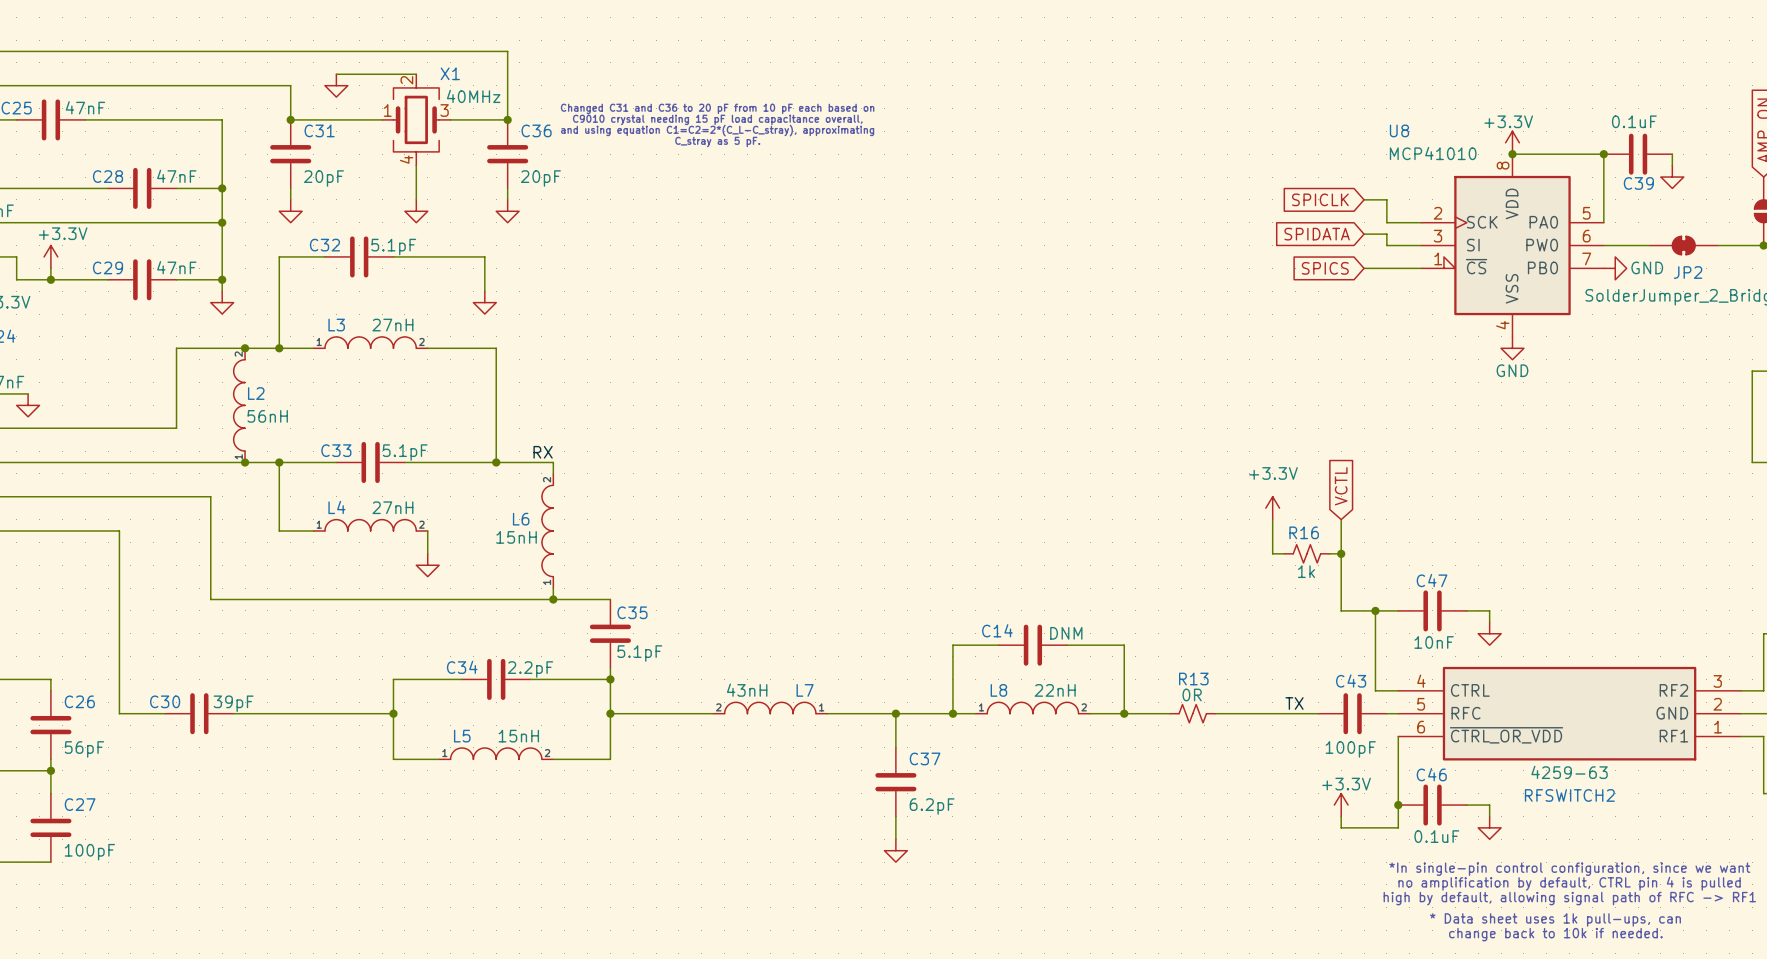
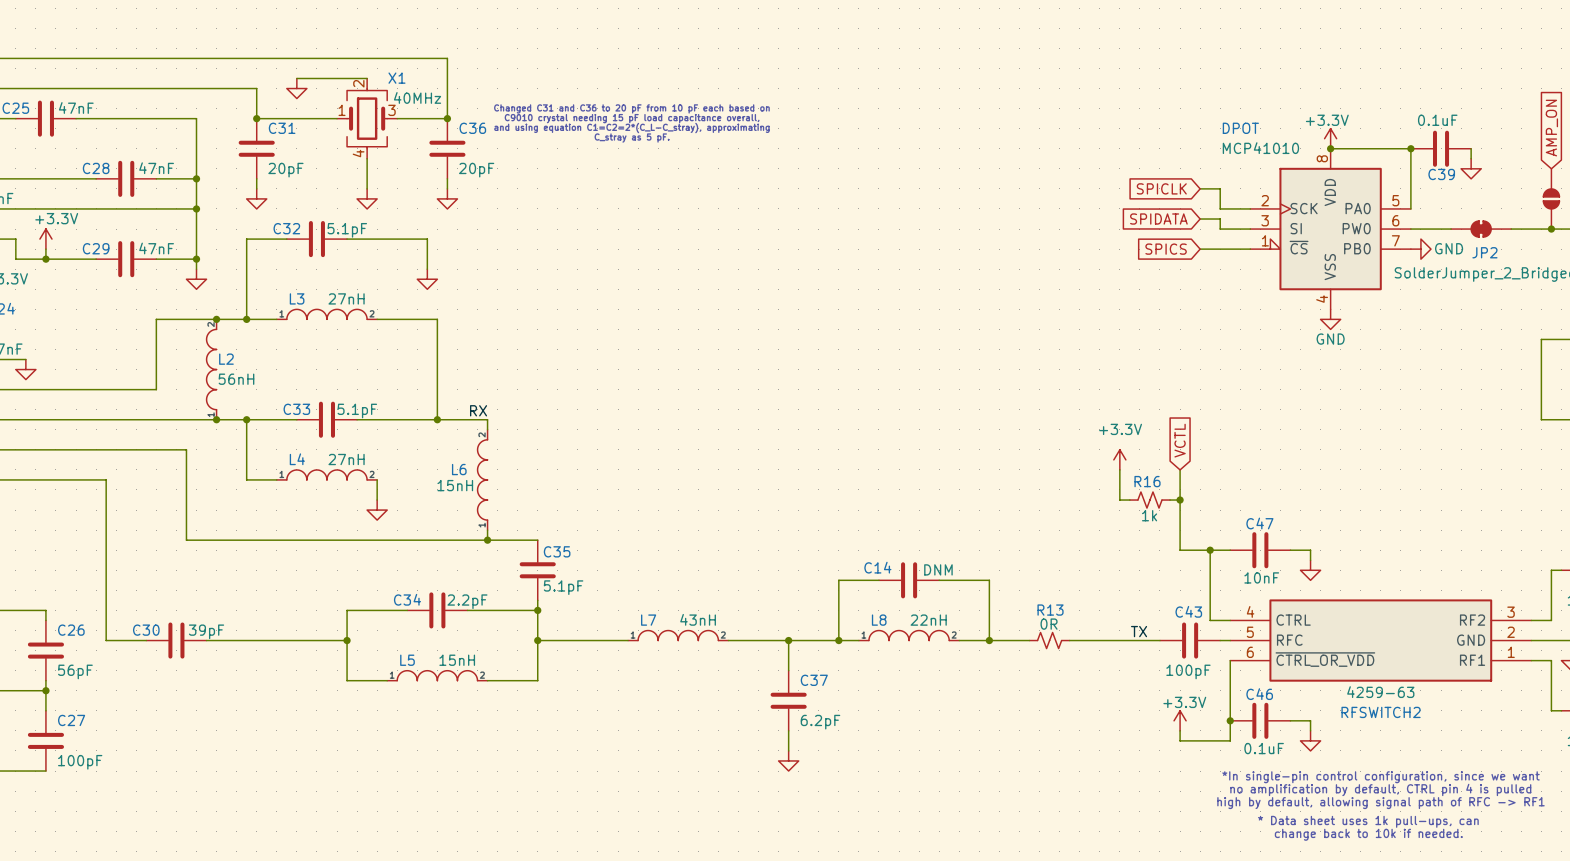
U8 name: U8 (1399, 130) -> DPOT (1240, 128)
L7 flip: as is (770, 708) -> left-right (678, 635)

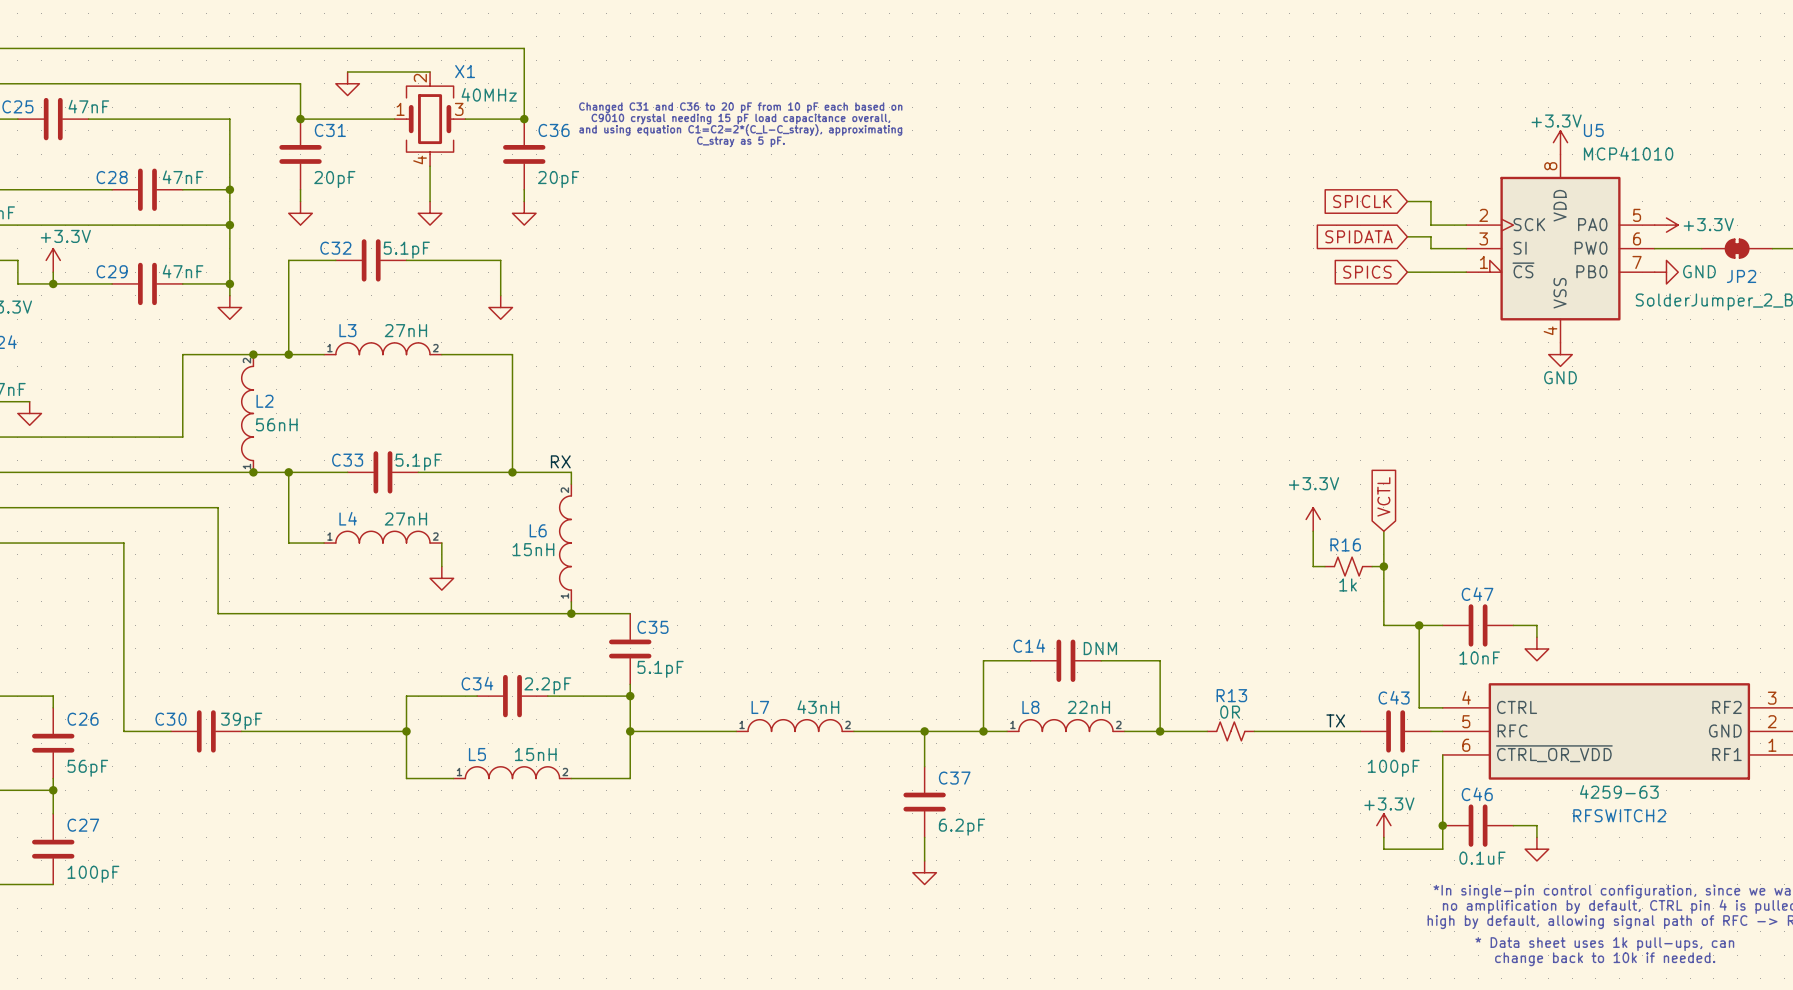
DPOT name: DPOT (1240, 128) -> U5 (1593, 130)
DPOT value position: MCP41010 (1260, 148) -> MCP41010 (1628, 153)
wire: (1330, 148) (1410, 148) (1410, 208) -> none
junction: (1330, 148) -> none
junction: (1410, 148) -> none
C39: 0.1uF (1441, 148) -> none
wire: (1471, 148) (1471, 158) -> none
power symbol: (1471, 168) -> none
power symbol: none -> +3.3V (1666, 225)

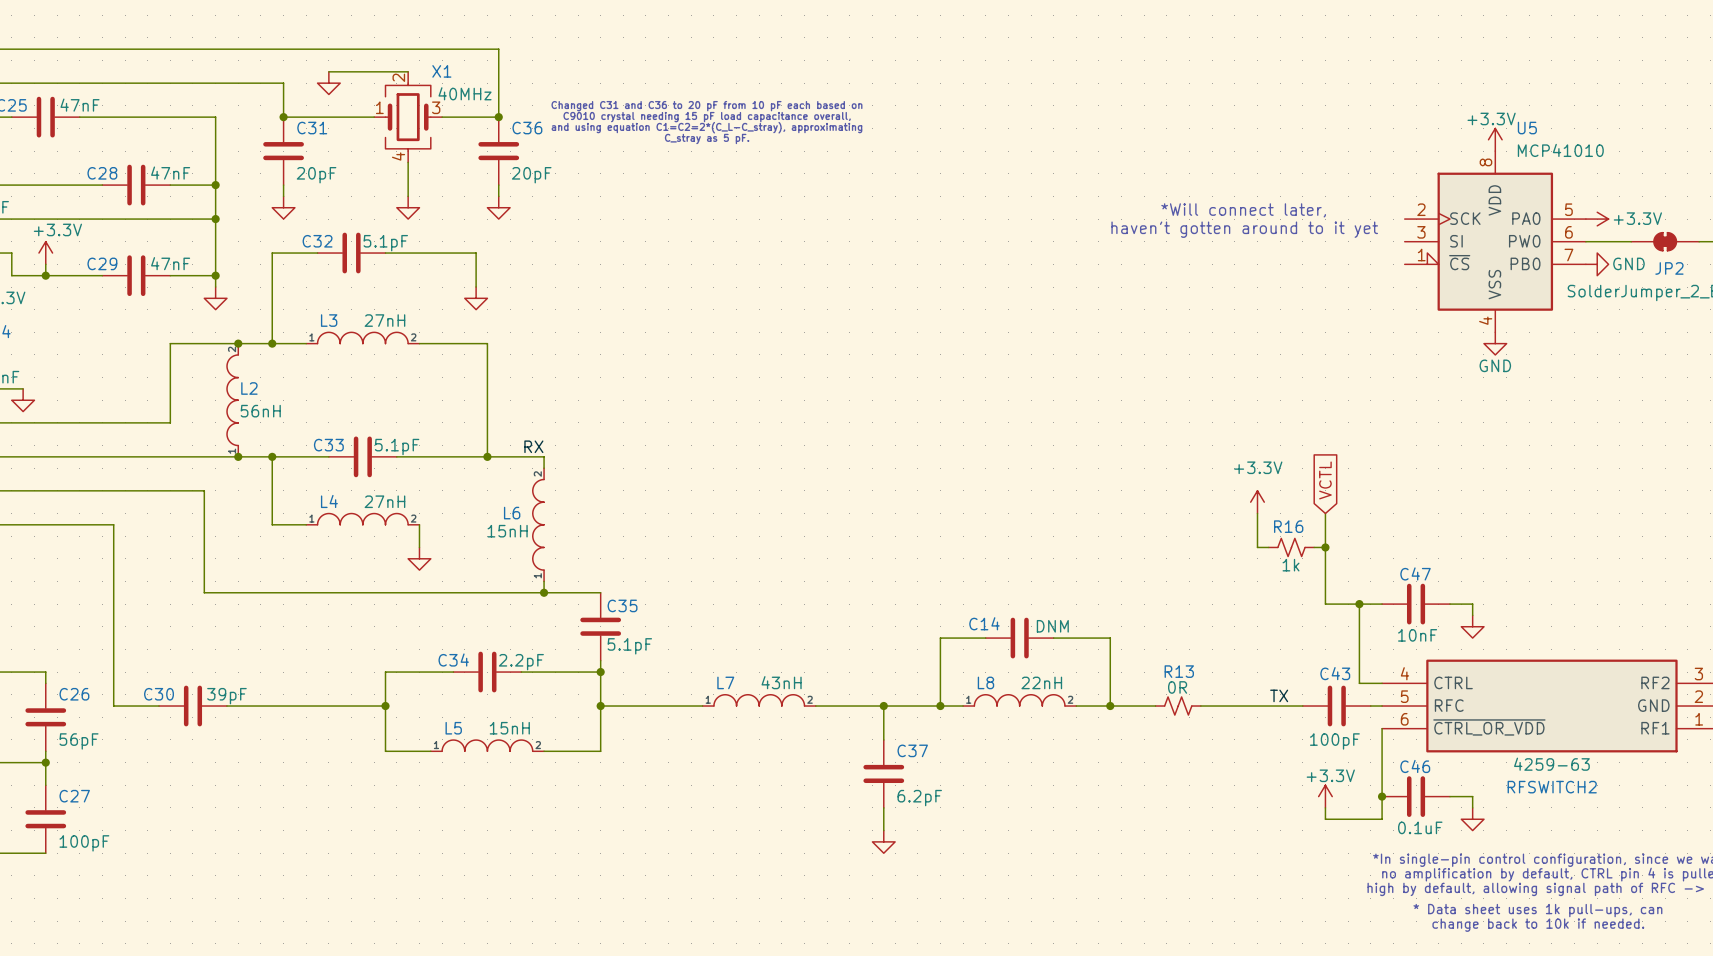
global label: SPICLK (1362, 201) -> none
wire: (1407, 201) (1430, 201) (1430, 225) (1466, 225) -> none
text: none -> *Will connect later, (1243, 210)
text: none -> haven't gotten around to it yet (1244, 229)
global label: SPIDATA (1359, 236) -> none
wire: (1407, 236) (1430, 236) (1430, 248) (1466, 248) -> none
global label: SPICS (1367, 272) -> none
wire: (1407, 272) (1466, 272) -> none

